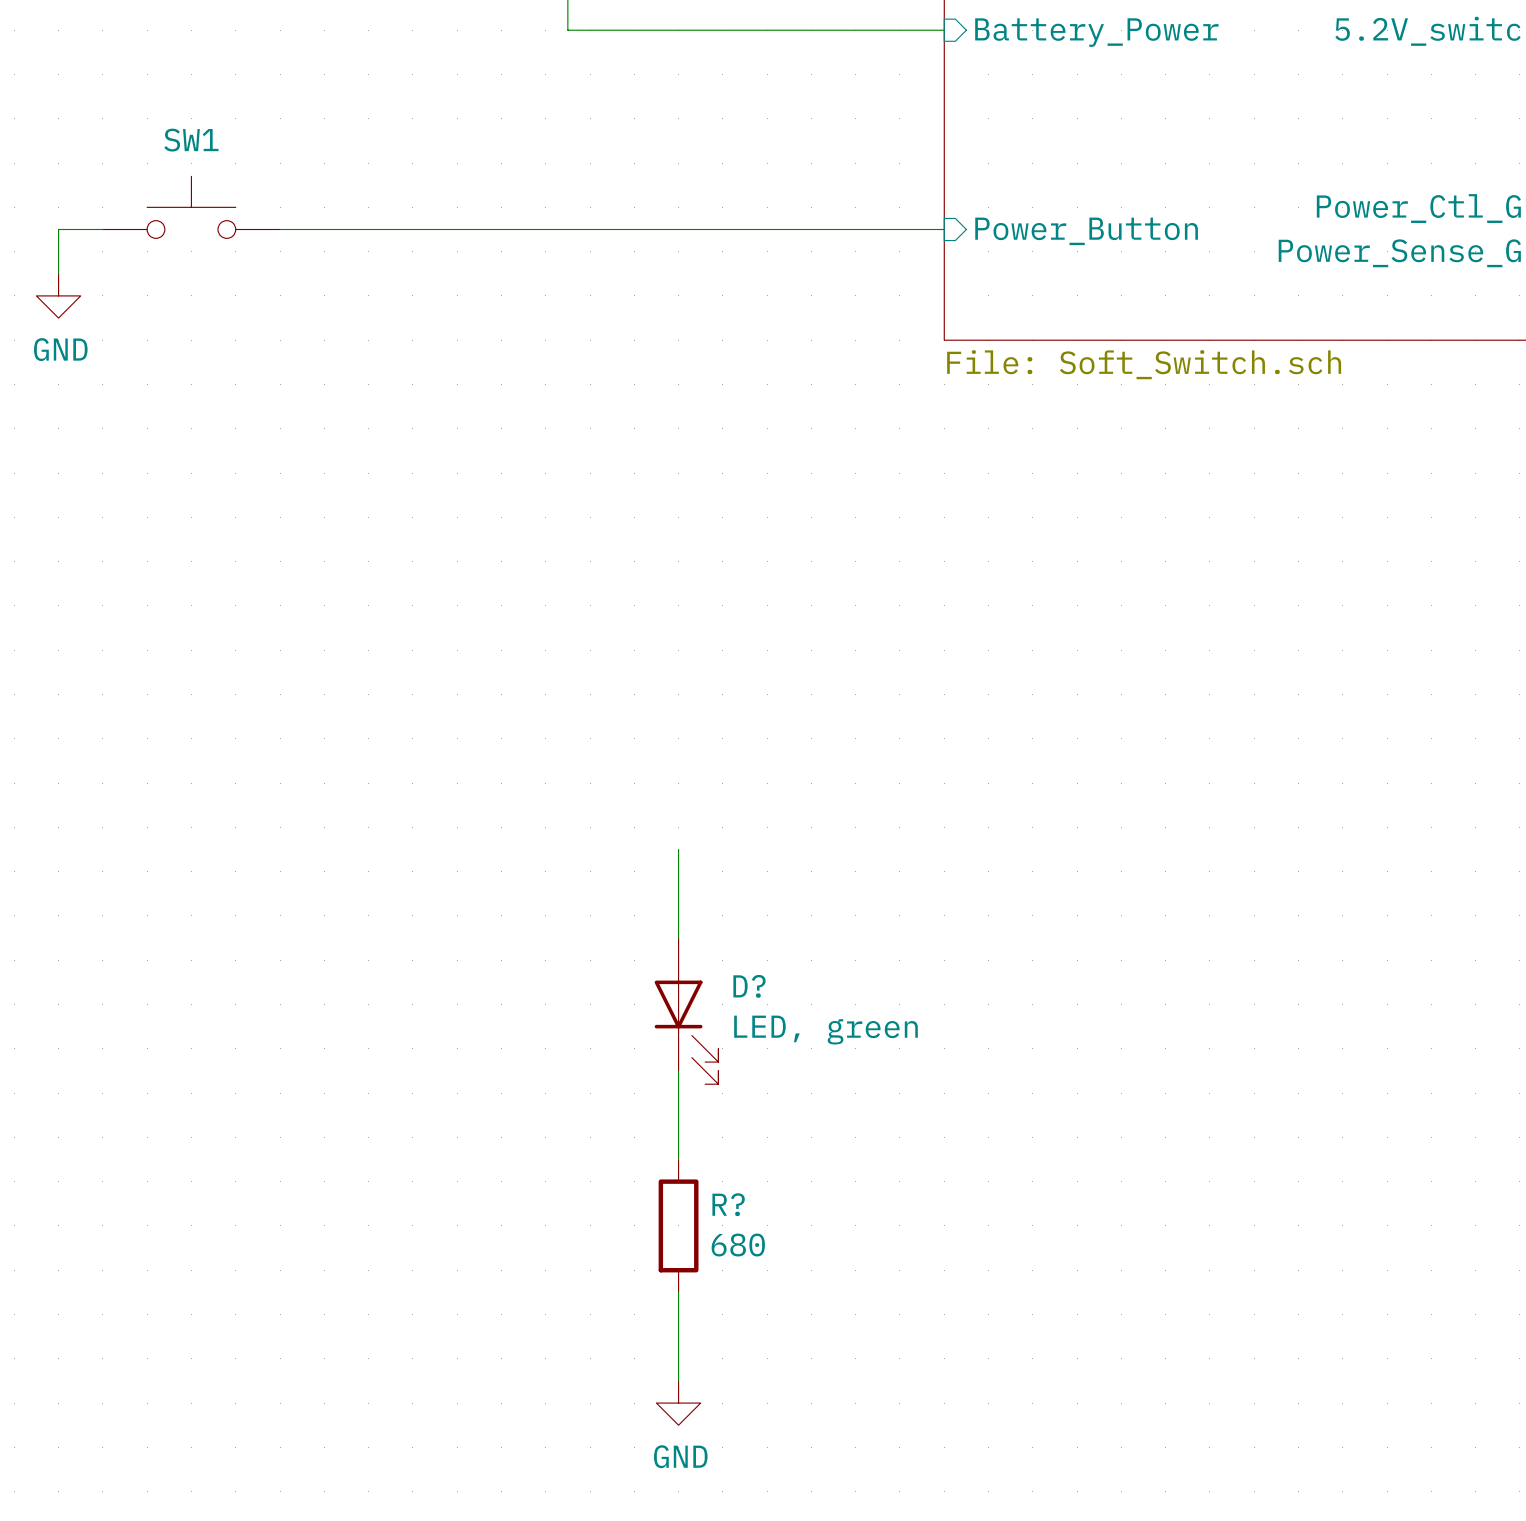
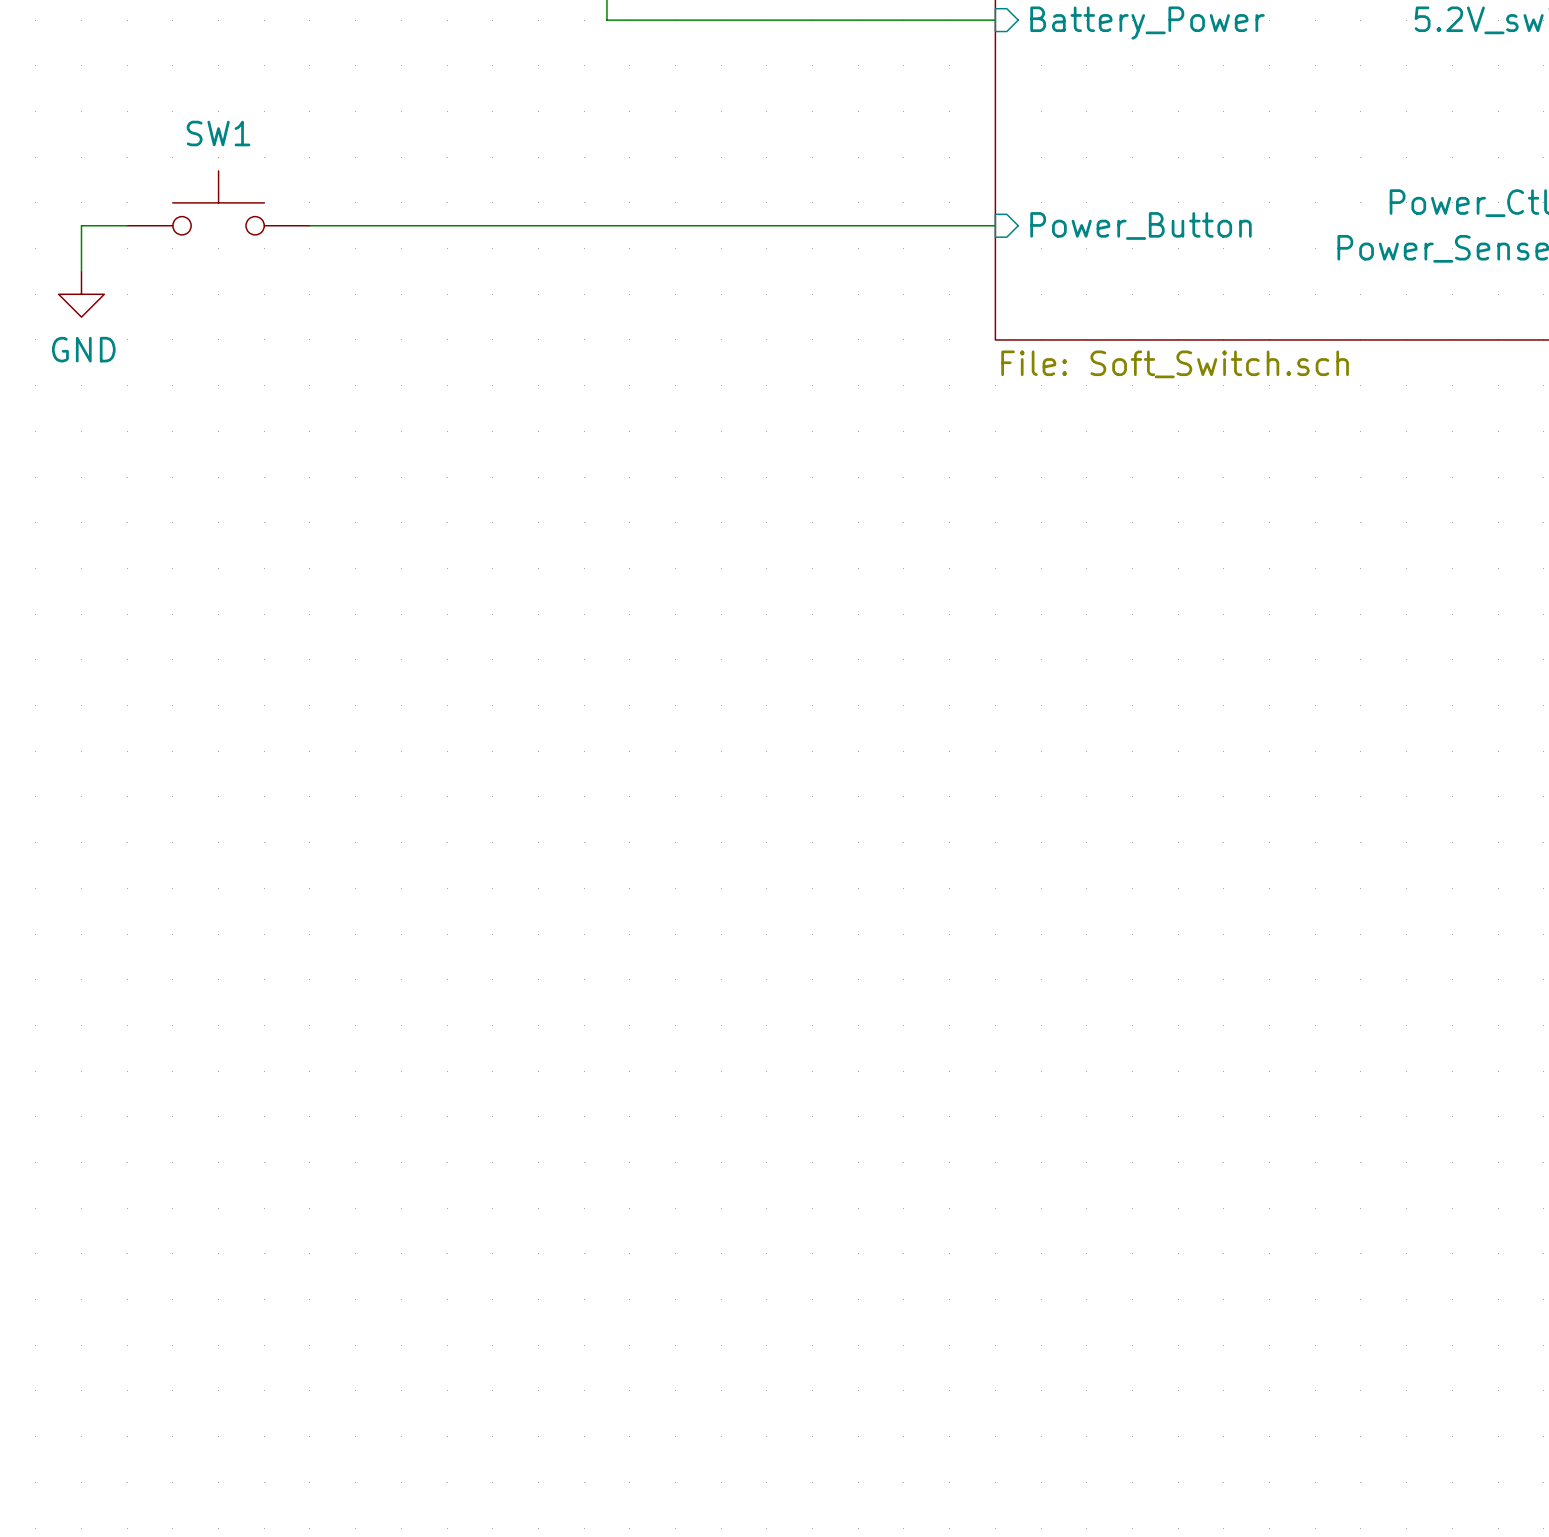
wire: (678, 849) (678, 938) -> none
D?: LED, green (686, 1011) -> none
wire: (678, 1070) (678, 1159) -> none
R?: 680 (678, 1225) -> none
wire: (678, 1292) (678, 1380) -> none
power symbol: GND (678, 1403) -> none

